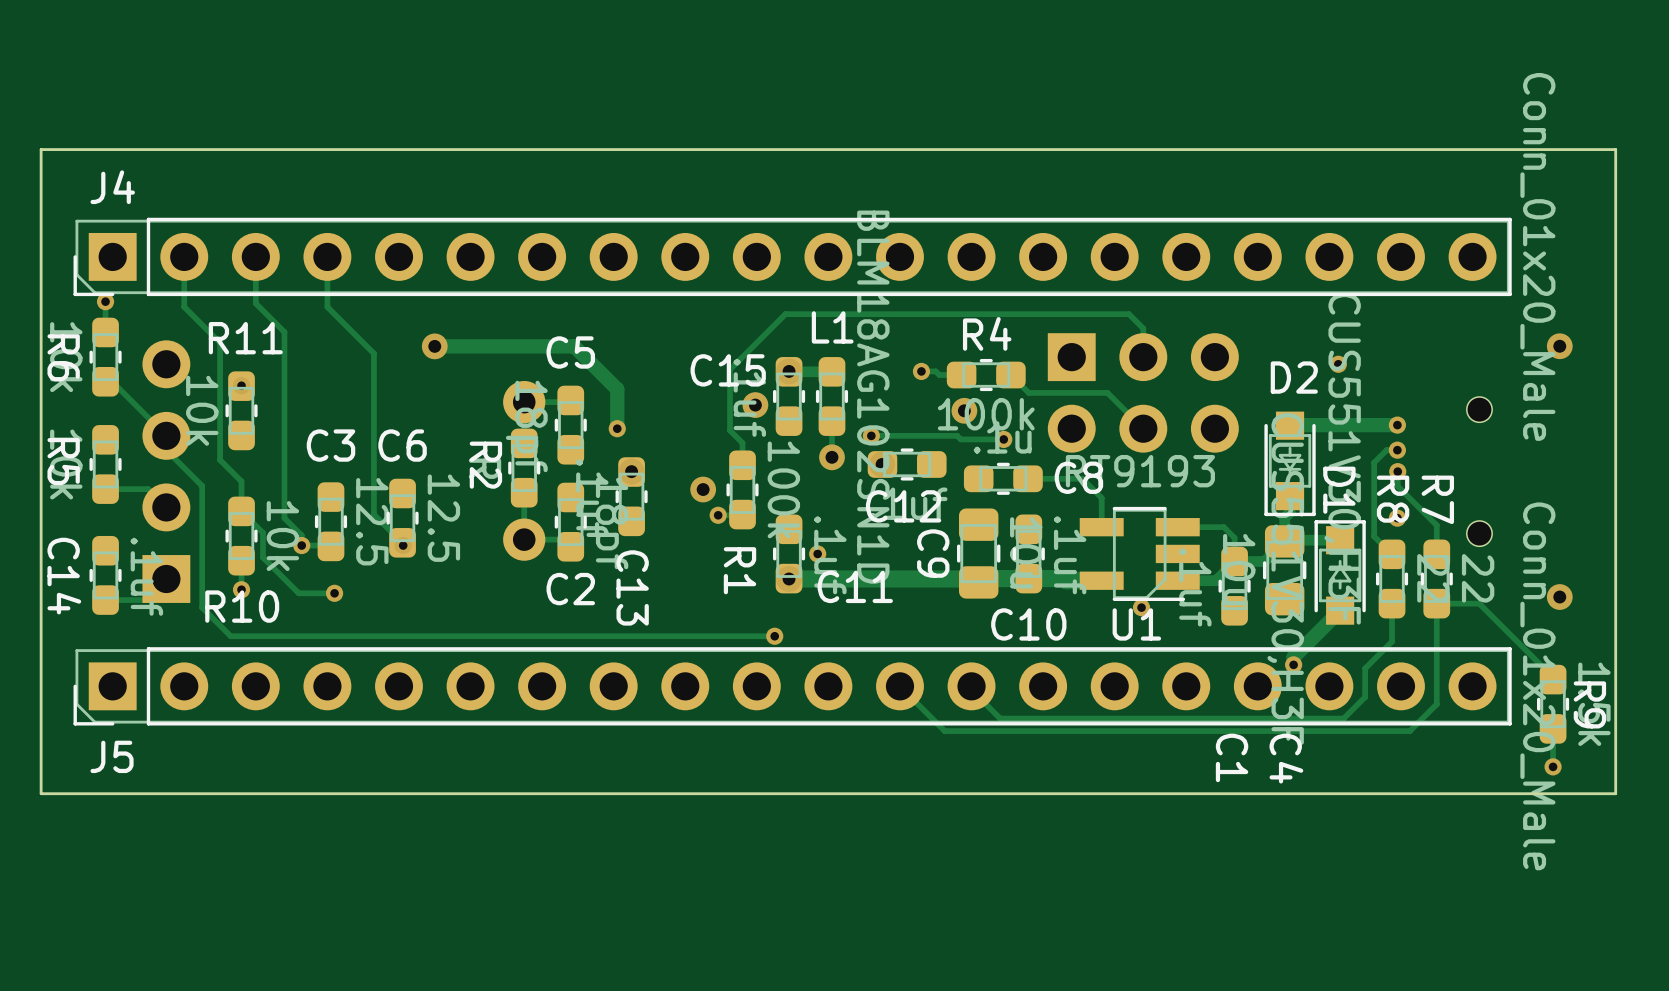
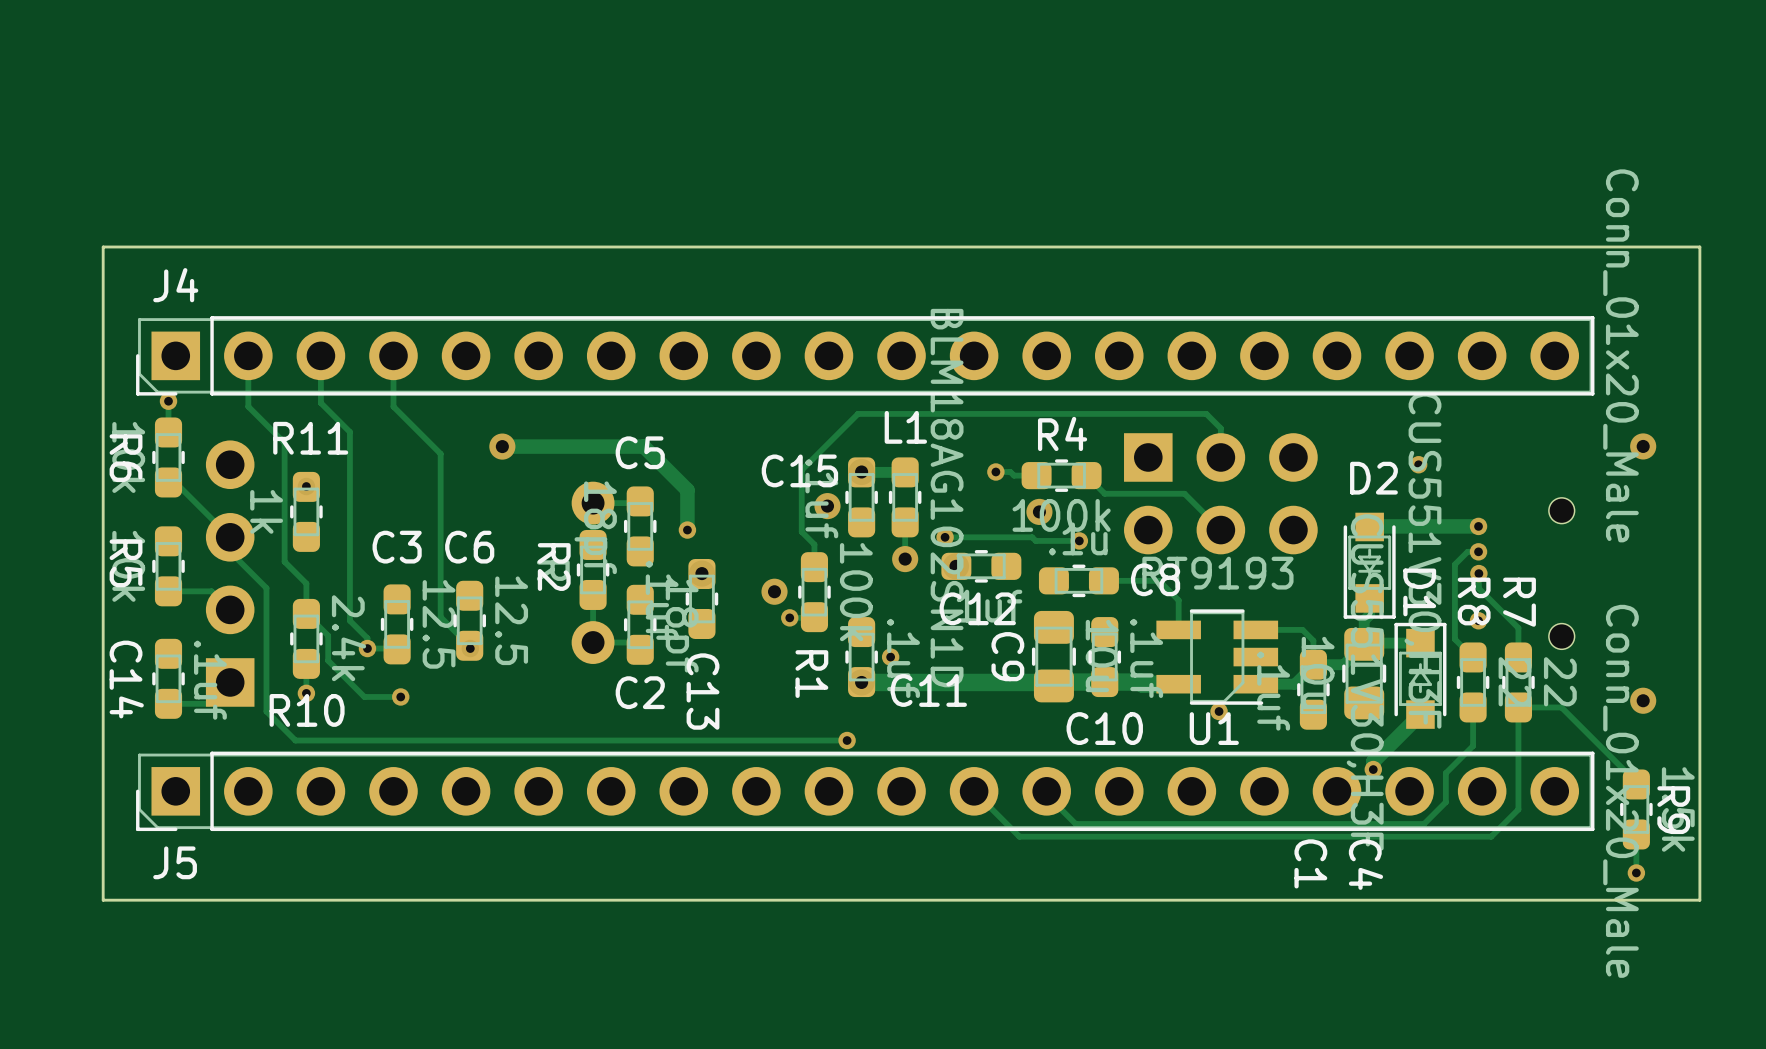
R11 value: 10k (202, 410) -> 1k (266, 511)
R10 value: 10k (282, 536) -> 2.4k (349, 638)

